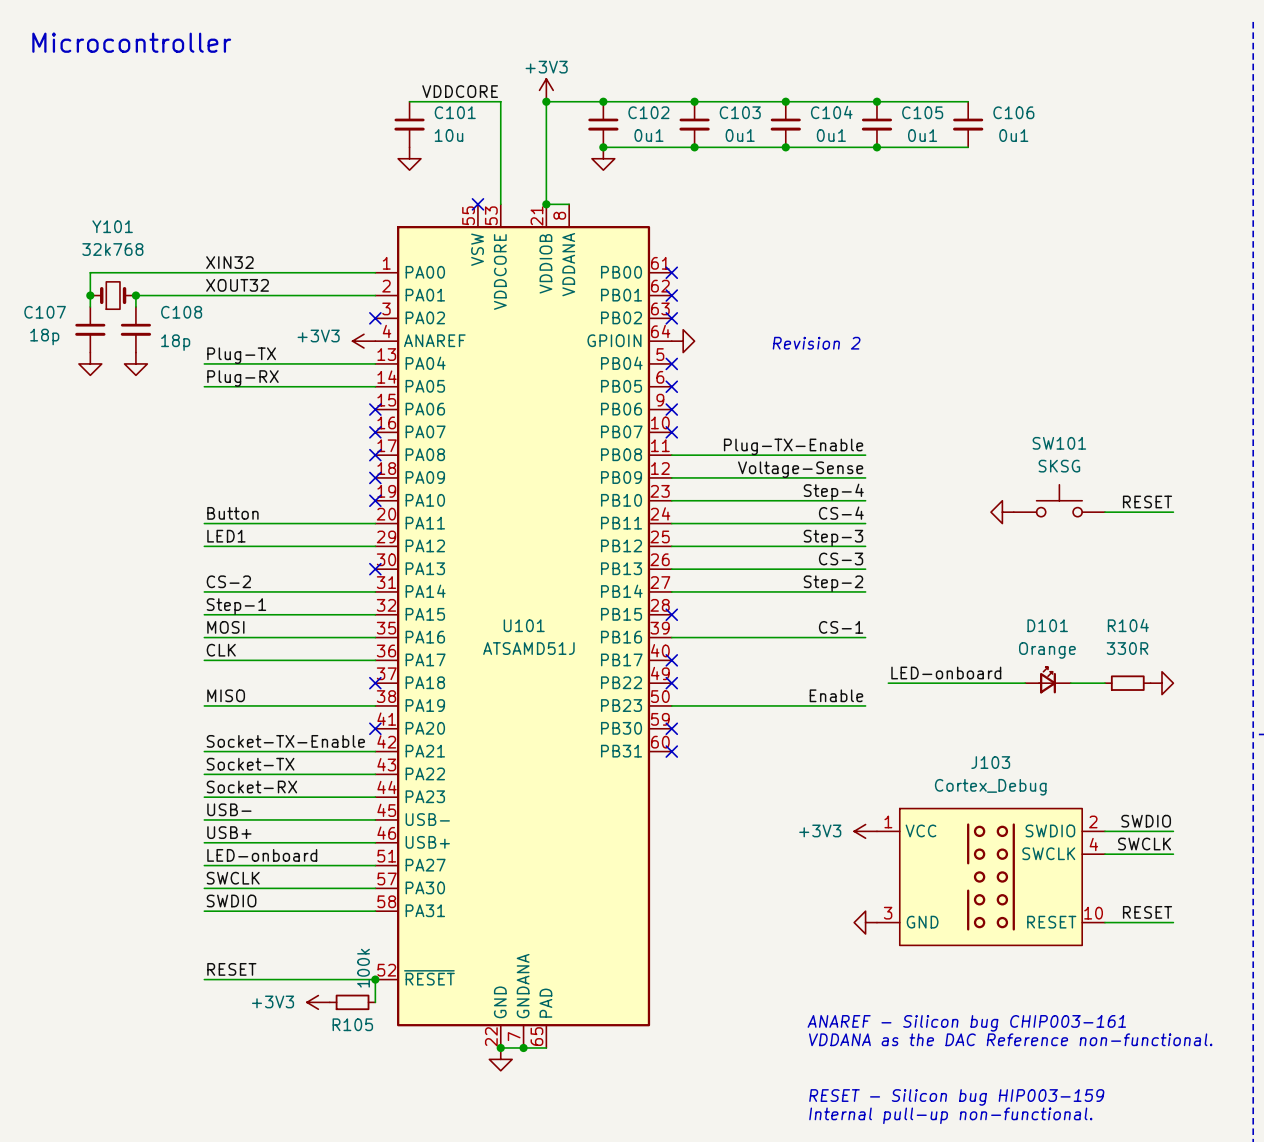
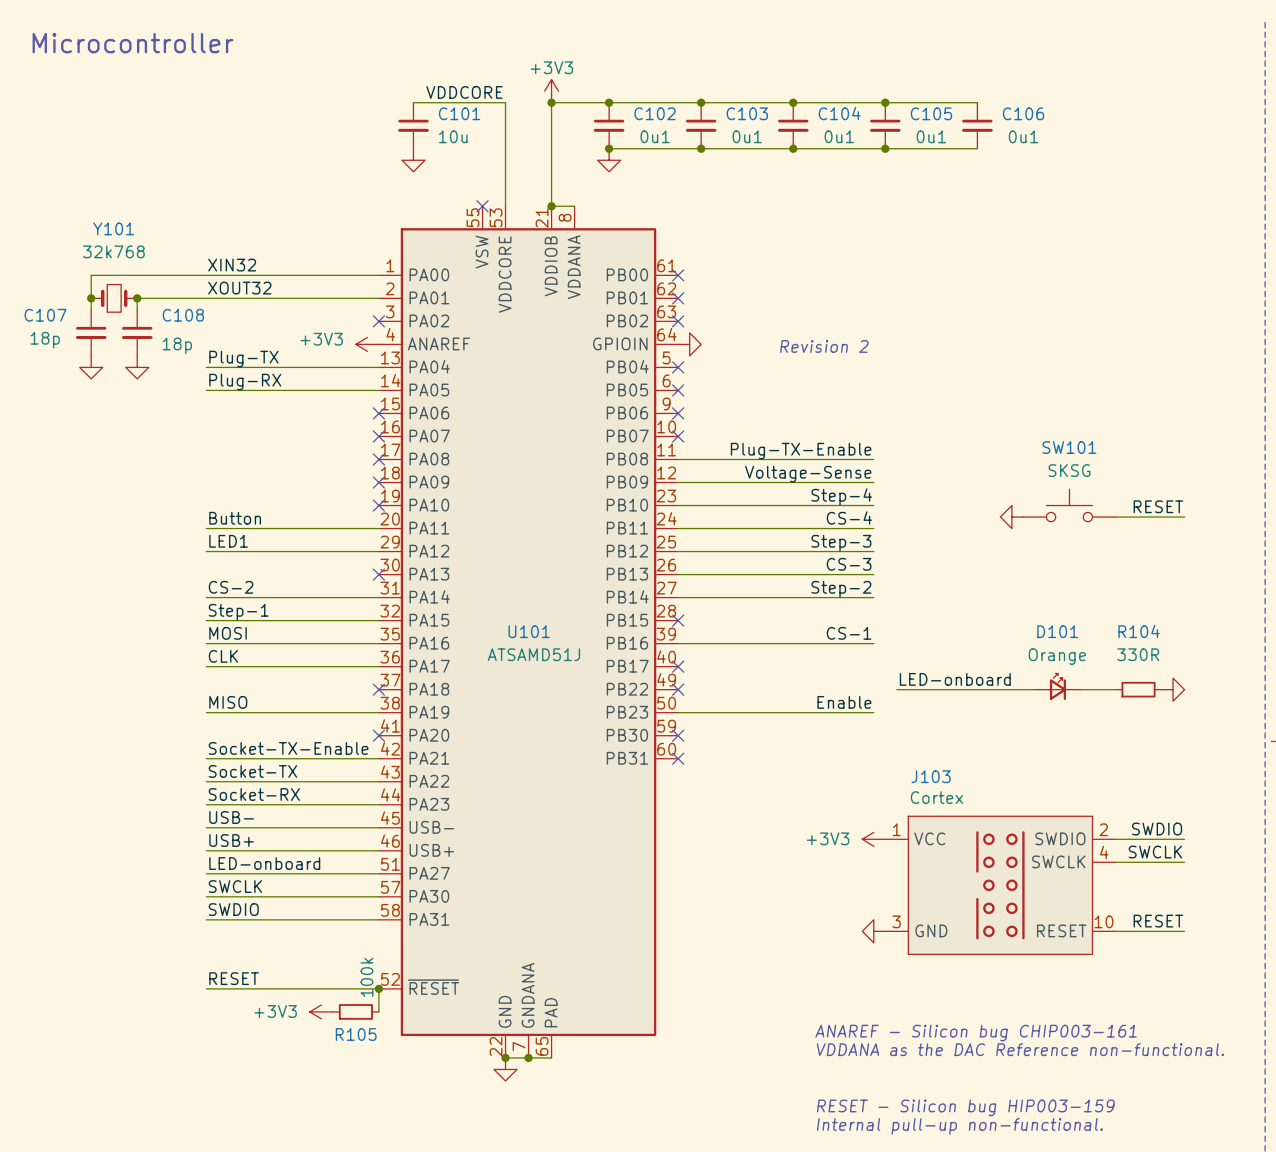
J103 name position: J103 (990, 762) -> J103 (931, 776)
J103 value: Cortex_Debug (990, 787) -> Cortex (936, 797)

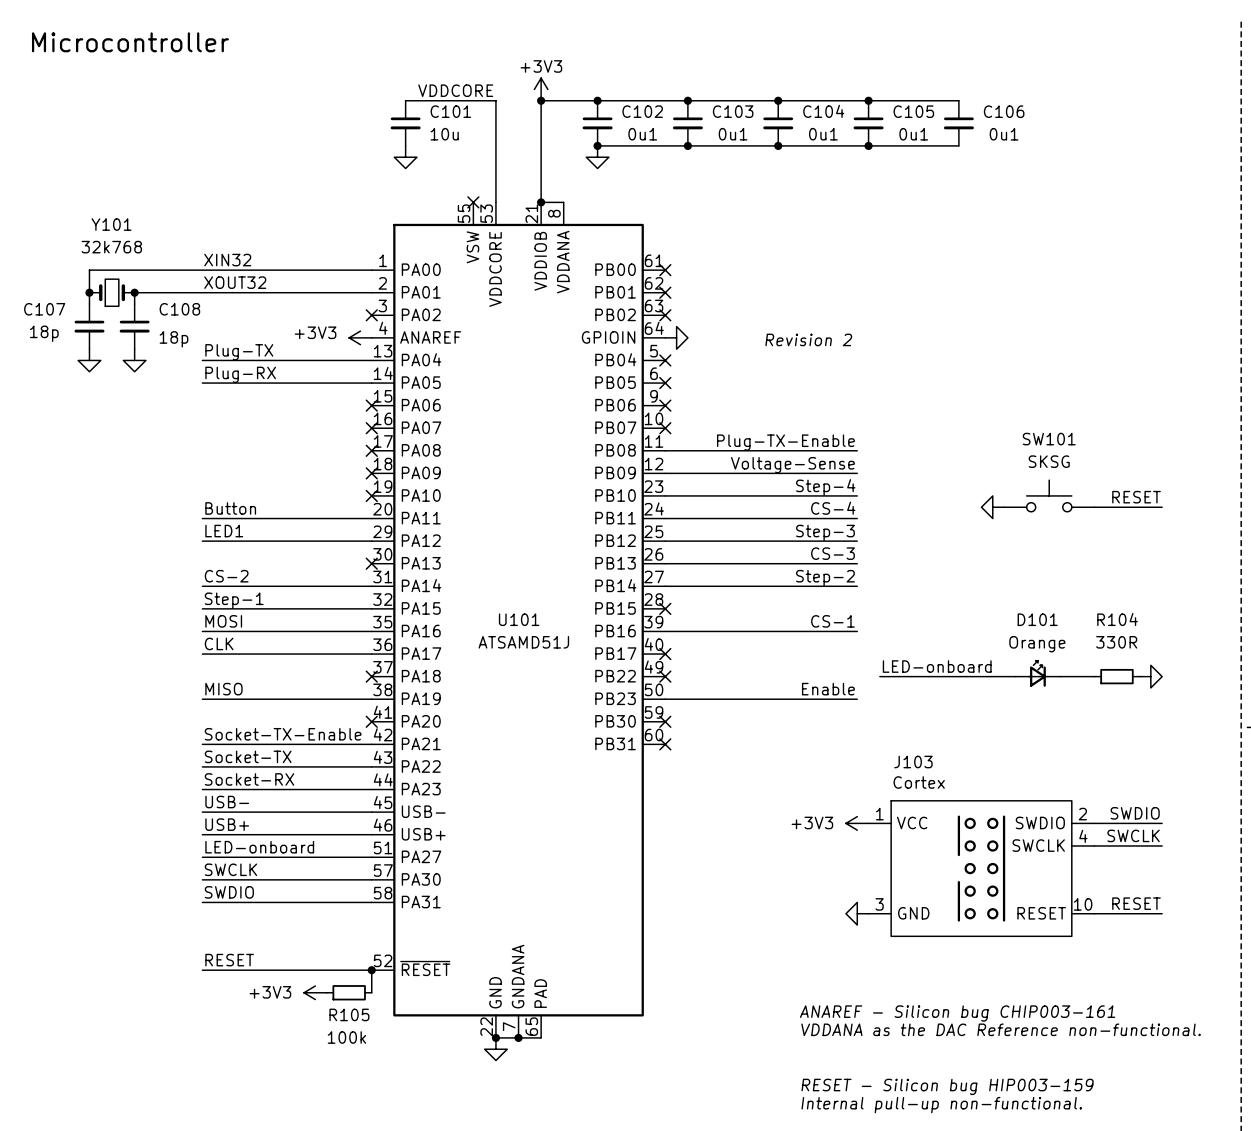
R105 value rotation: 0° (366, 977) -> 90° clockwise (346, 1037)
R105 value position: 100k (366, 977) -> 100k (346, 1037)

